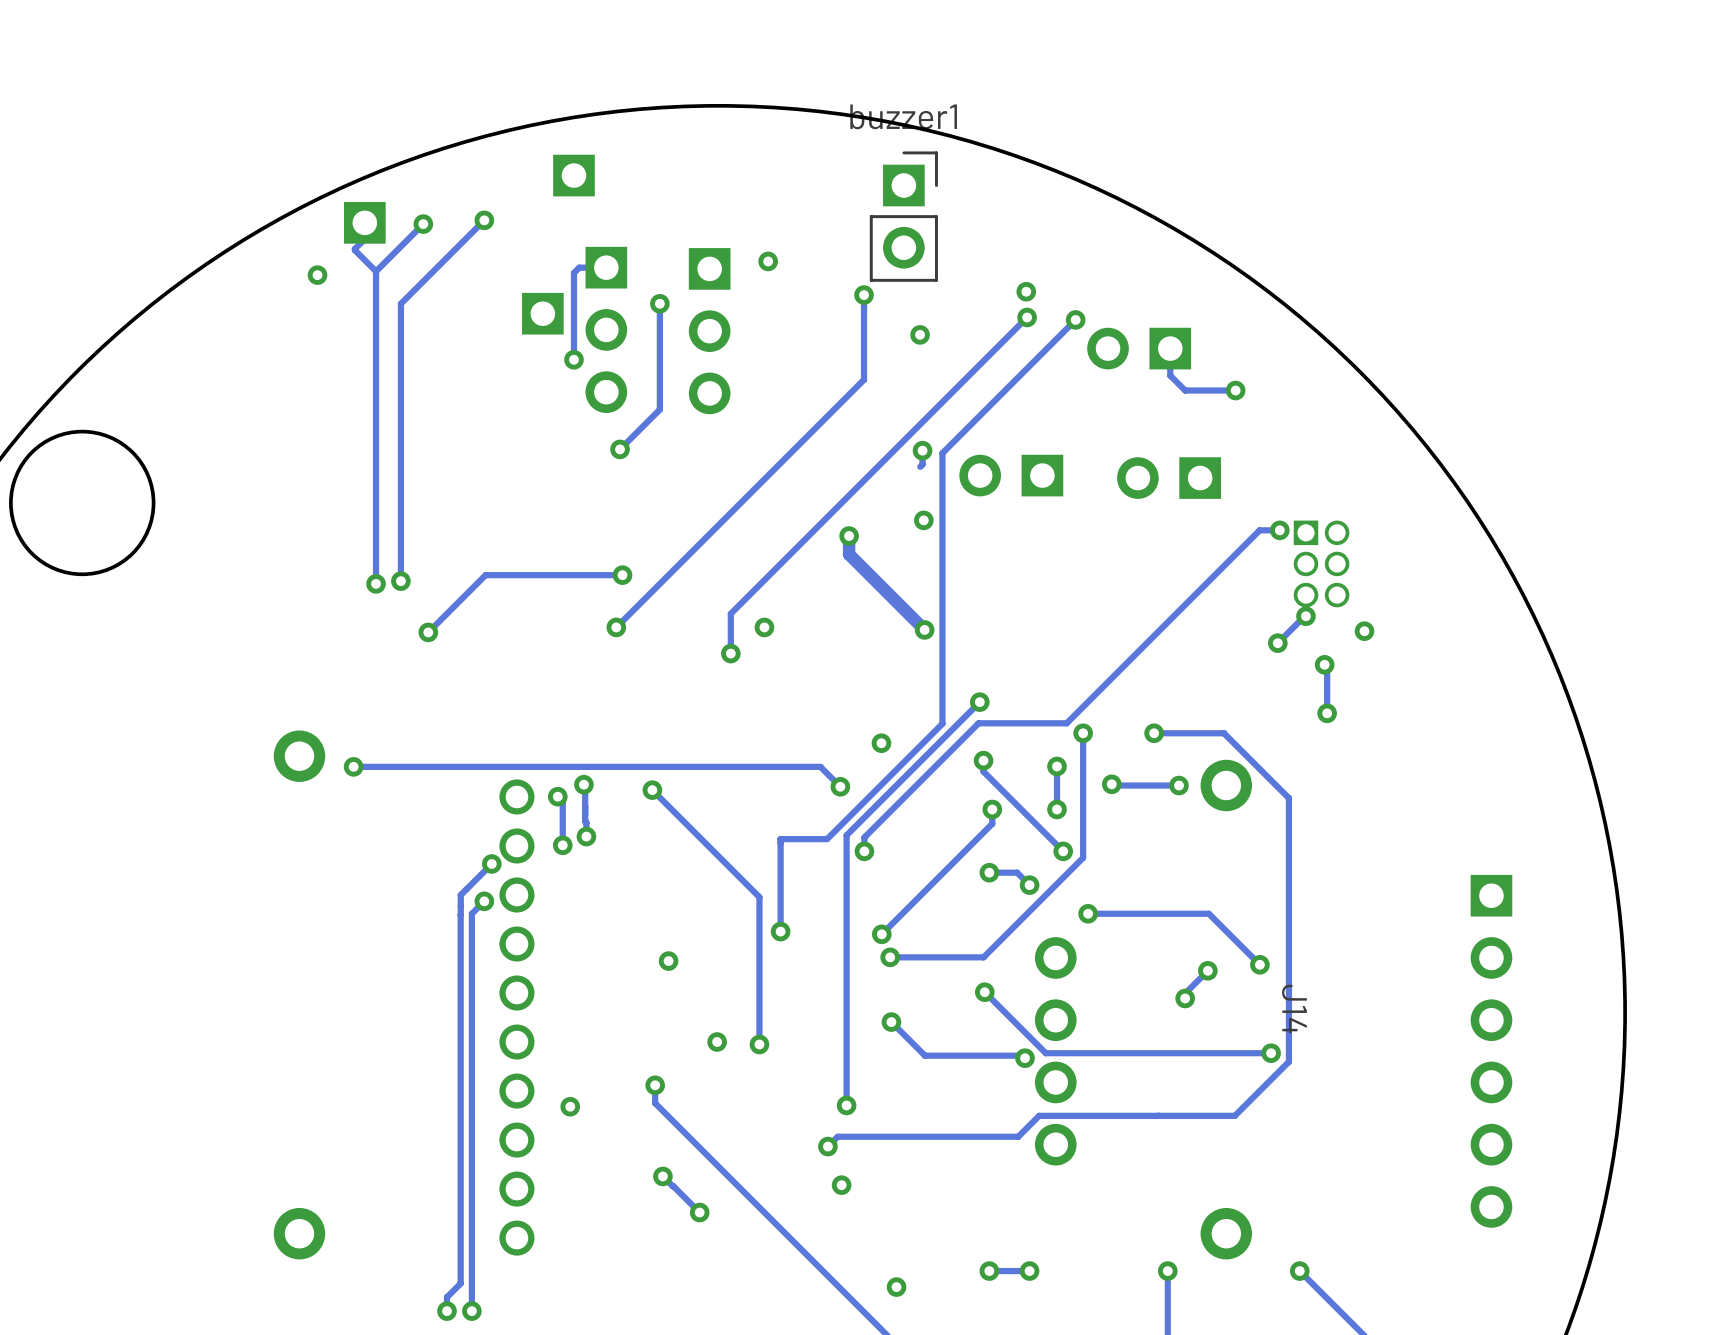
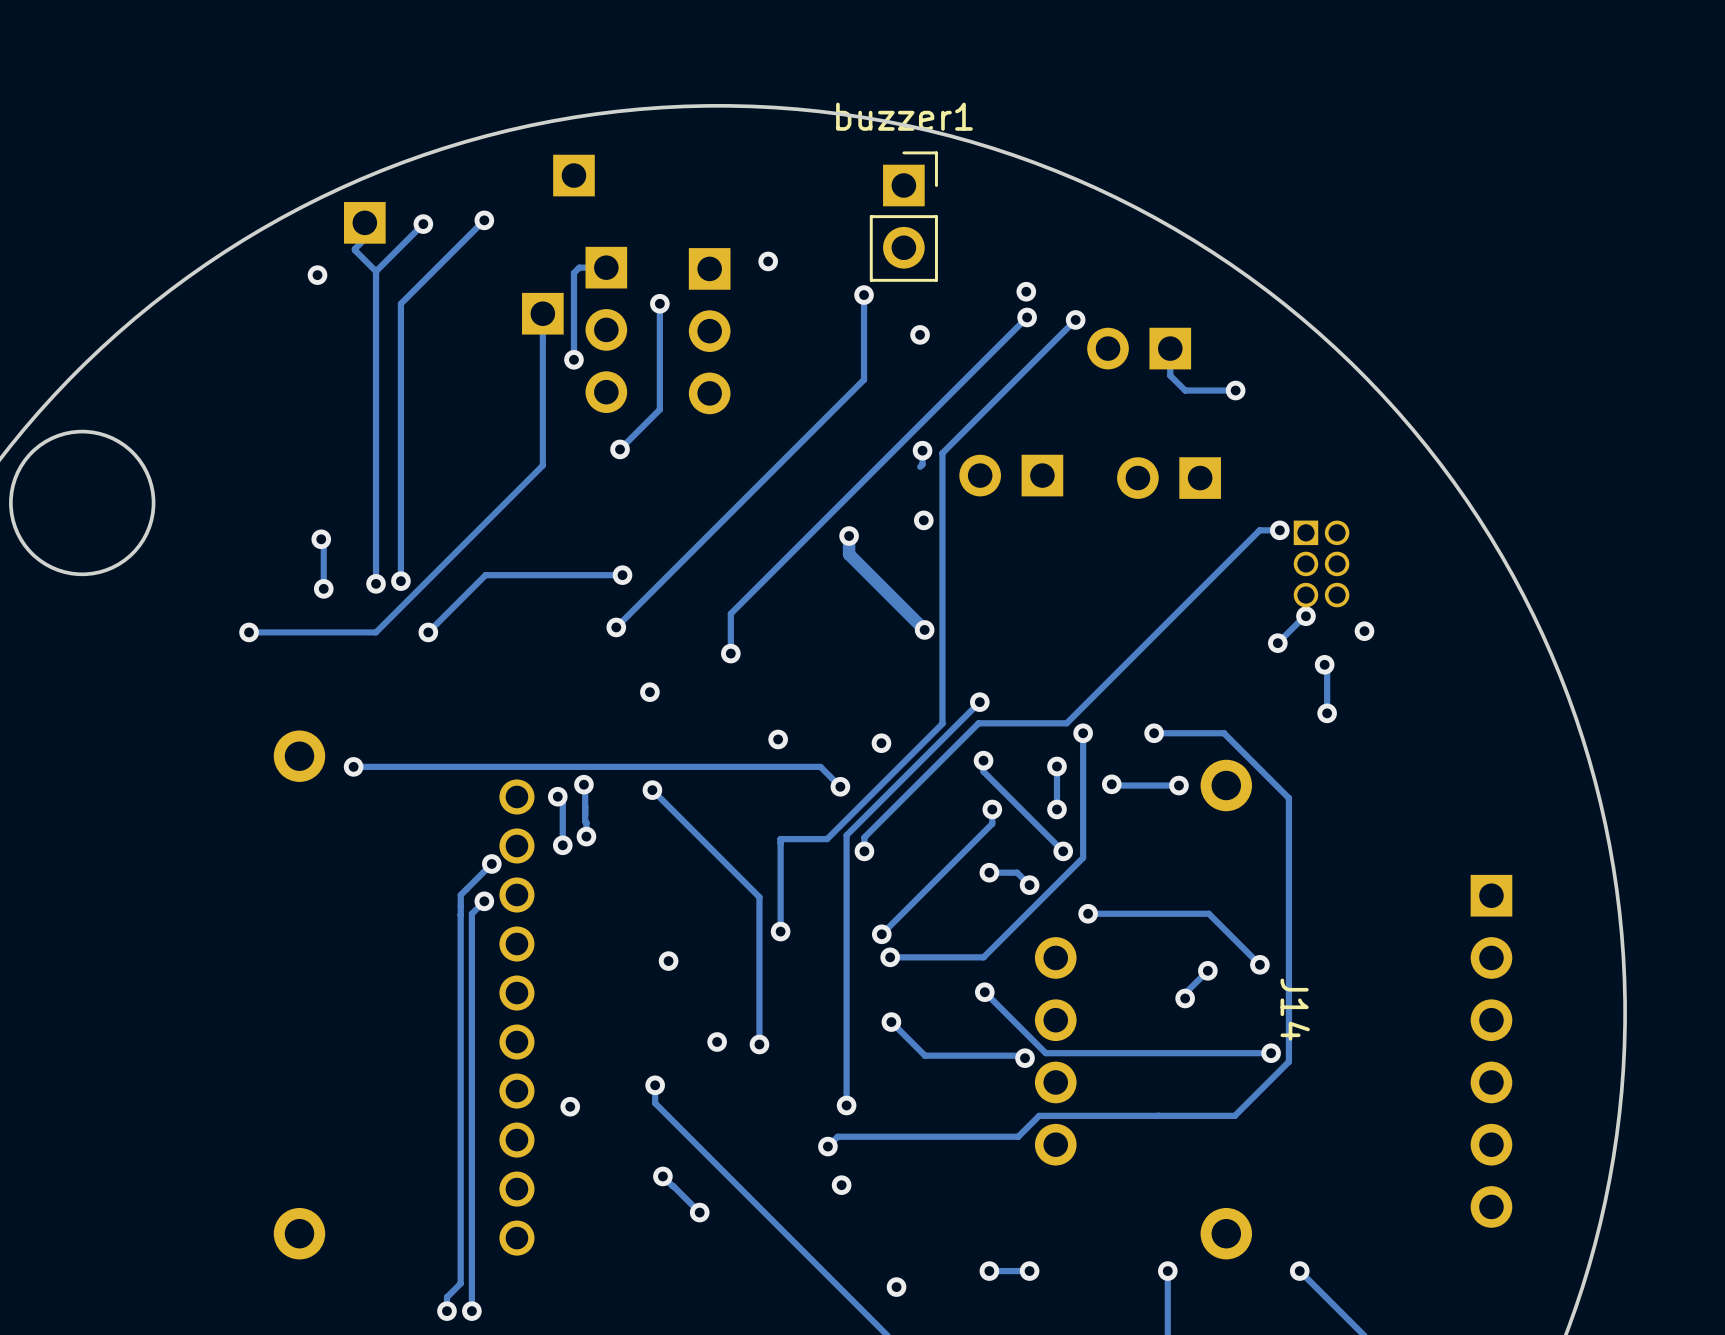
track: none -> (542, 313) (542, 465) (375, 632) (249, 632)
track: none -> (321, 539) (323, 541) (323, 588)
via: none -> (321, 539)
via: none -> (323, 588)
via: (764, 627) -> none
via: none -> (249, 632)
via: none -> (649, 692)
via: none -> (778, 739)

